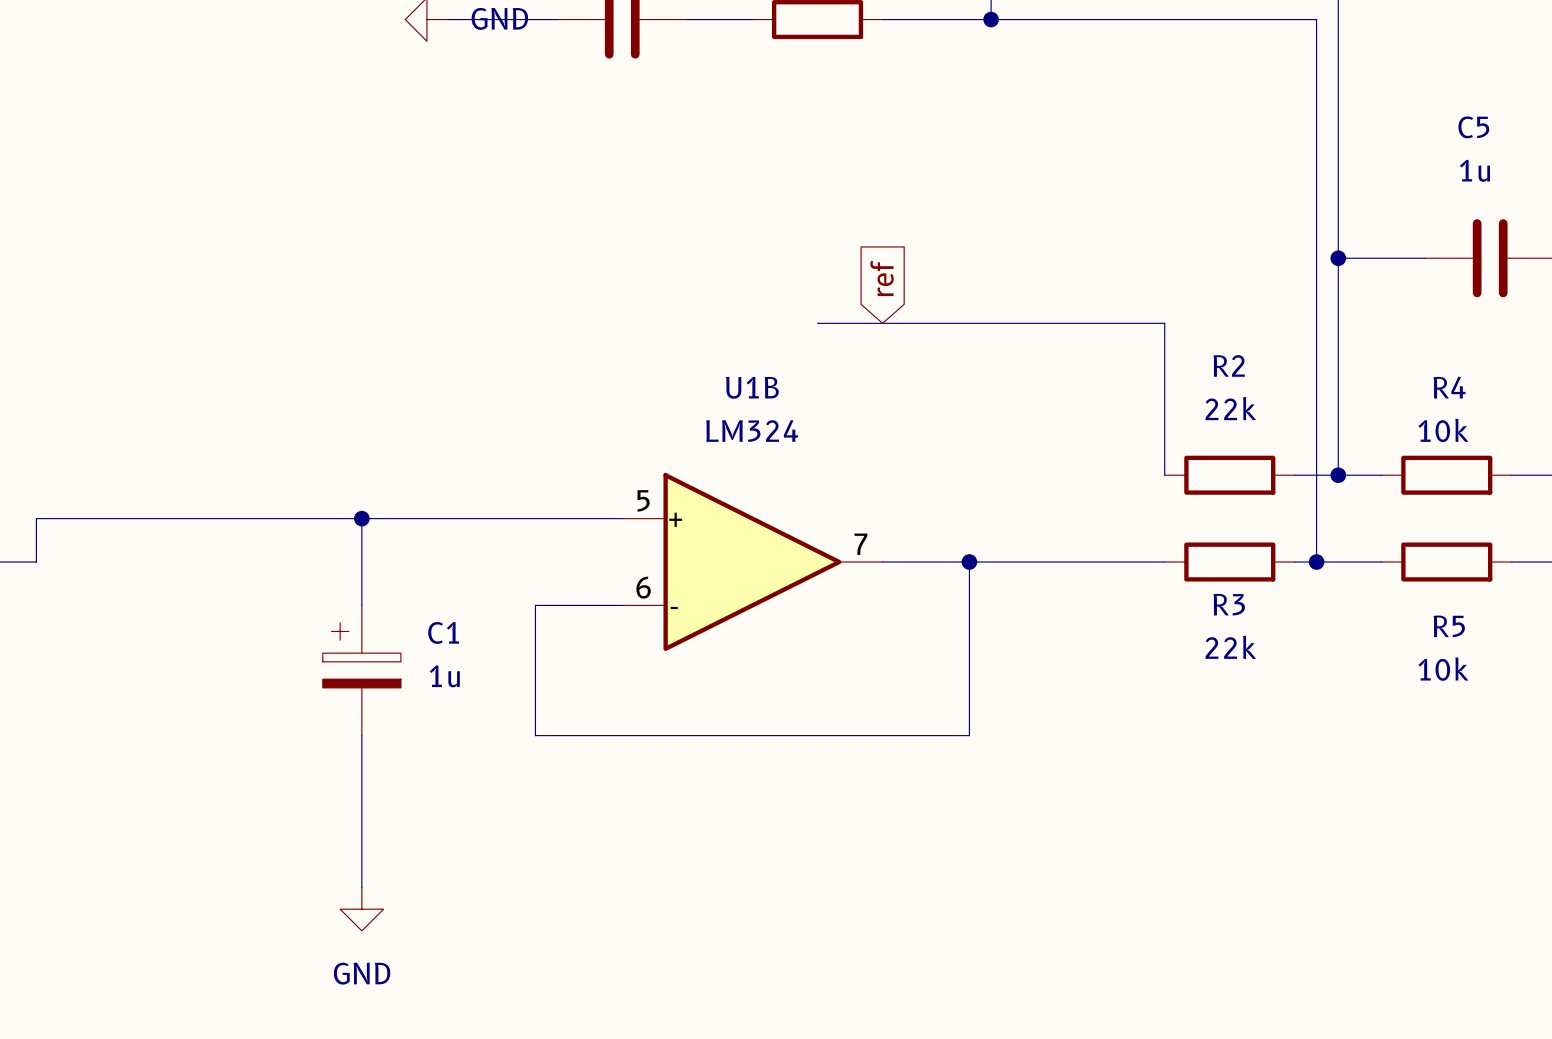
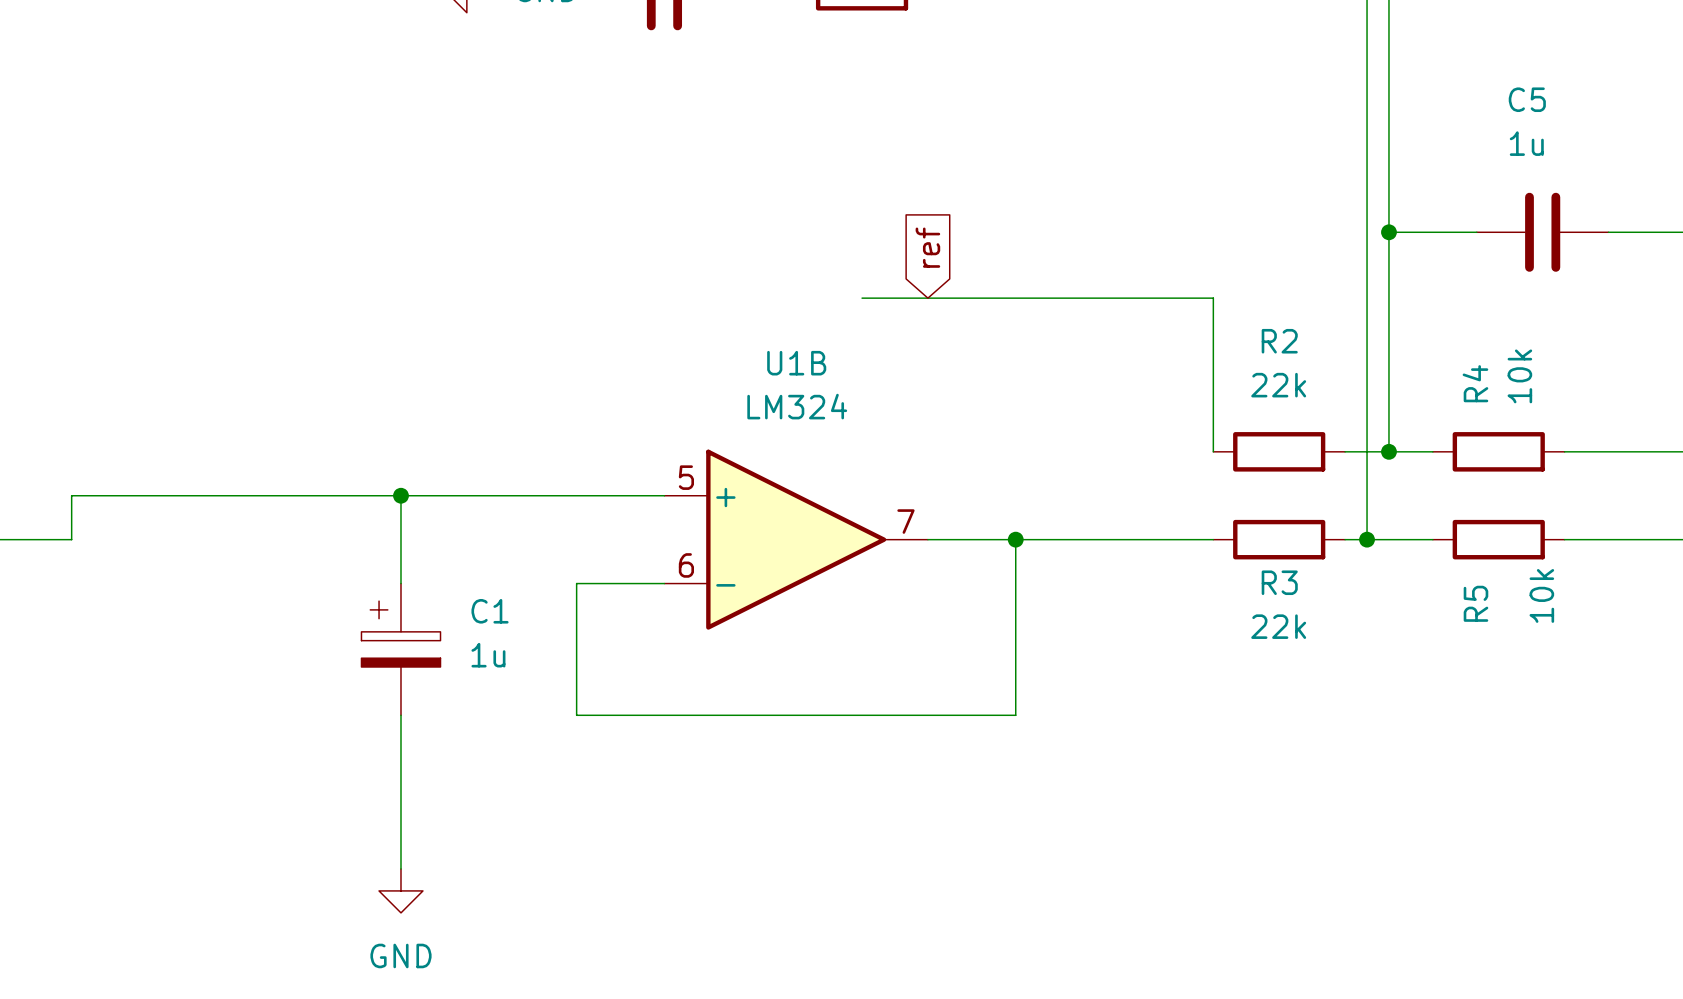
R4 name rotation: 0° (1449, 387) -> 90° counterclockwise (1475, 383)
R4 value rotation: 0° (1443, 430) -> 90° counterclockwise (1519, 376)
R5 name rotation: 0° (1449, 626) -> 90° counterclockwise (1475, 603)
R5 value rotation: 0° (1443, 669) -> 90° counterclockwise (1541, 595)
R5 value position: 10k (1443, 669) -> 10k (1541, 595)

